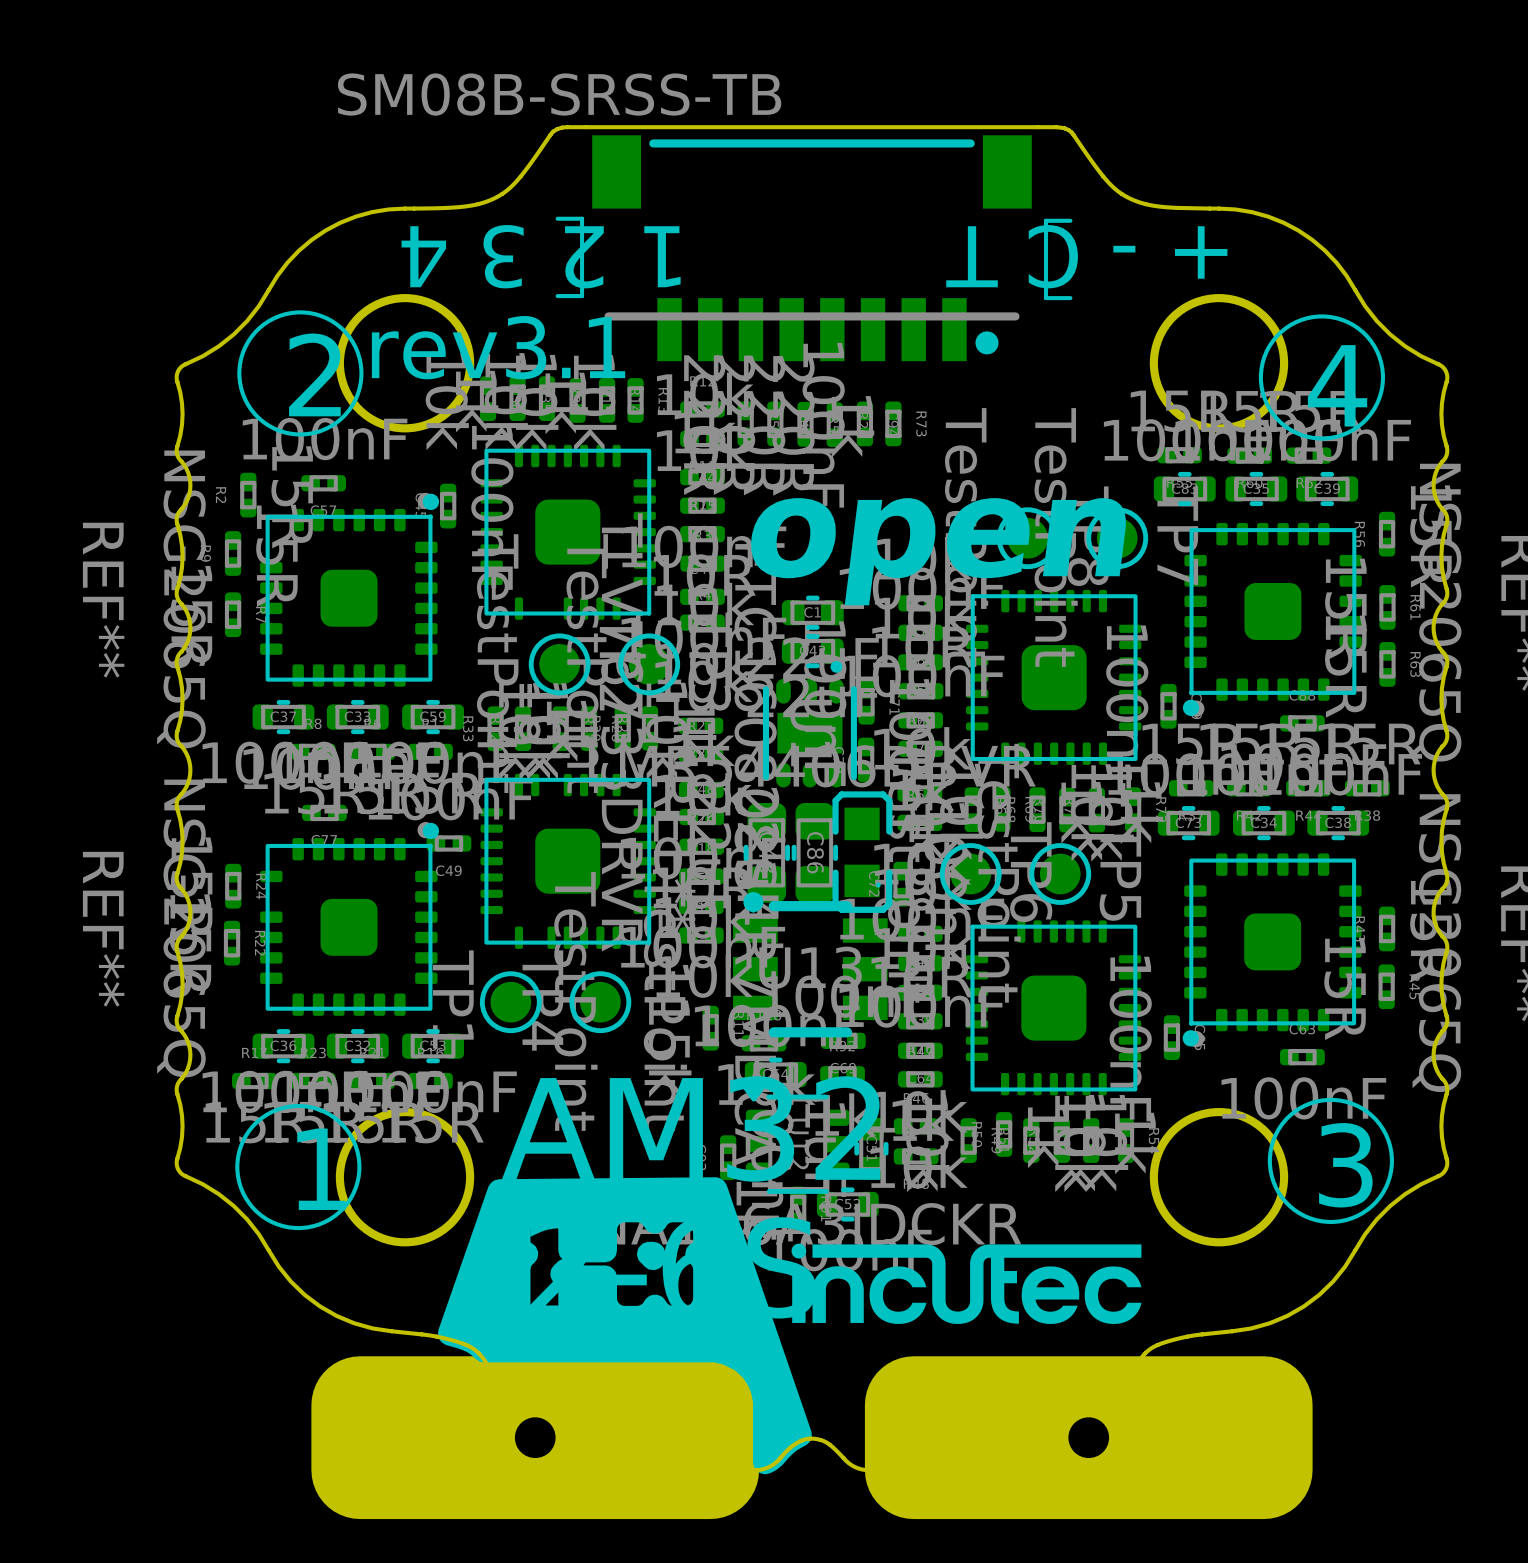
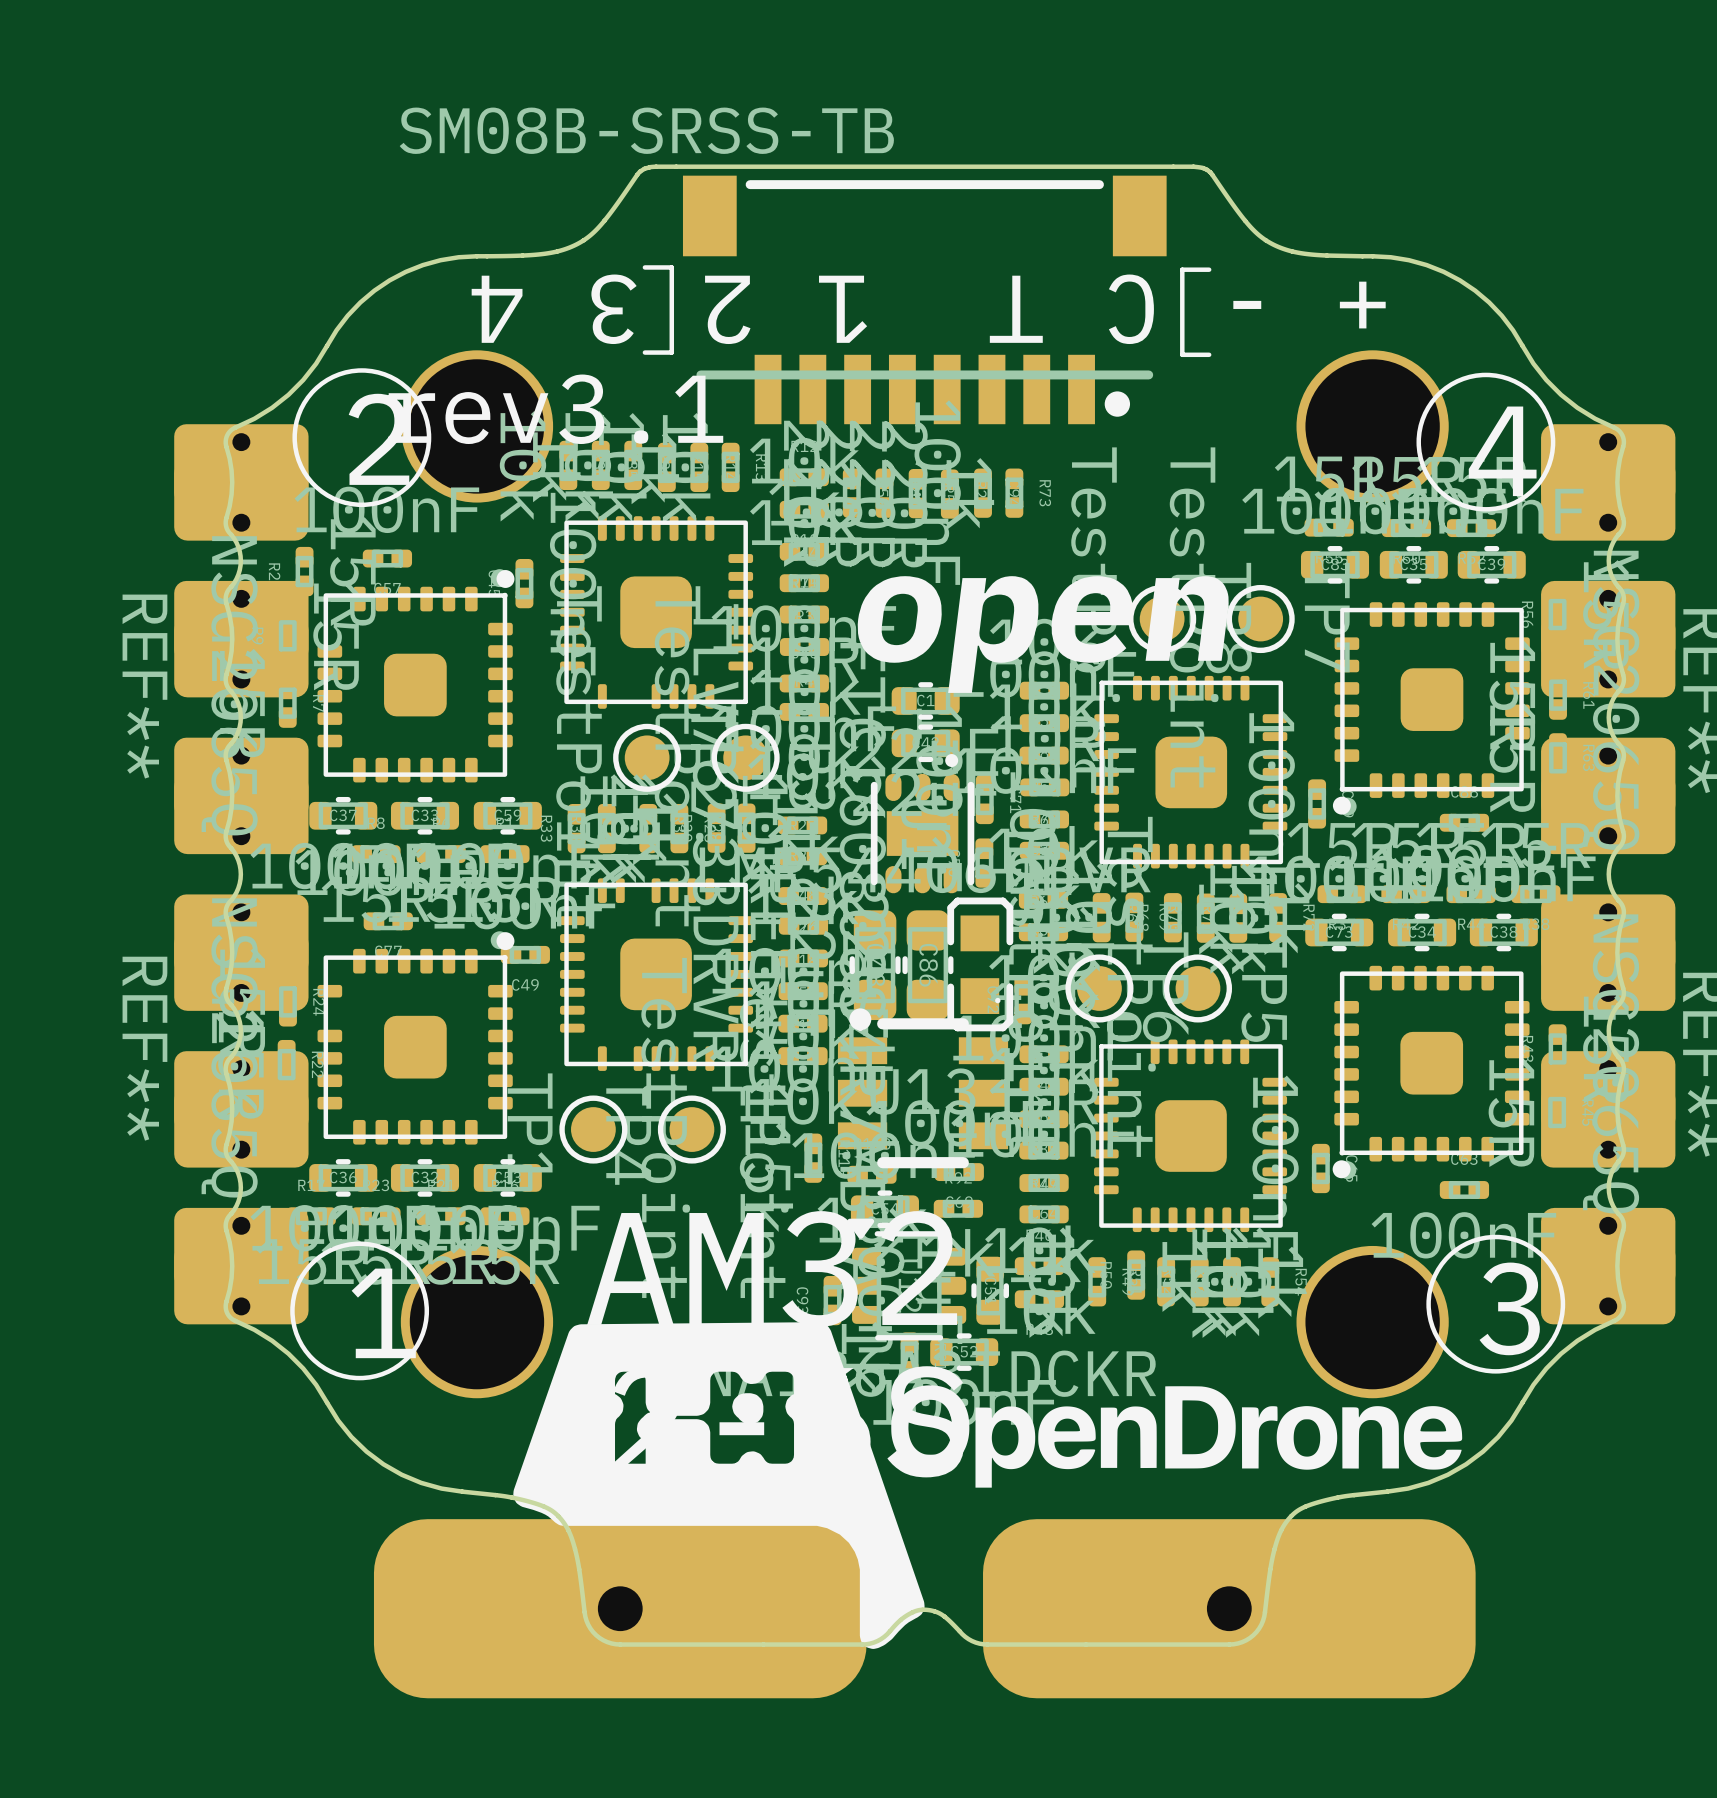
part footprint: [174, 125, 1450, 1520] -> [174, 164, 1676, 1699]
drawing: none -> [891, 1385, 970, 1470]
drawing: [791, 1243, 1142, 1324] -> none
drawing: none -> [1038, 1406, 1157, 1470]
drawing: none -> [1276, 1406, 1463, 1470]
drawing shape: [869, 1266, 927, 1324] -> [975, 1406, 1036, 1488]
drawing shape: [1021, 1266, 1080, 1324] -> [1165, 1386, 1236, 1469]
drawing shape: [1084, 1266, 1142, 1324] -> [1241, 1406, 1278, 1469]

